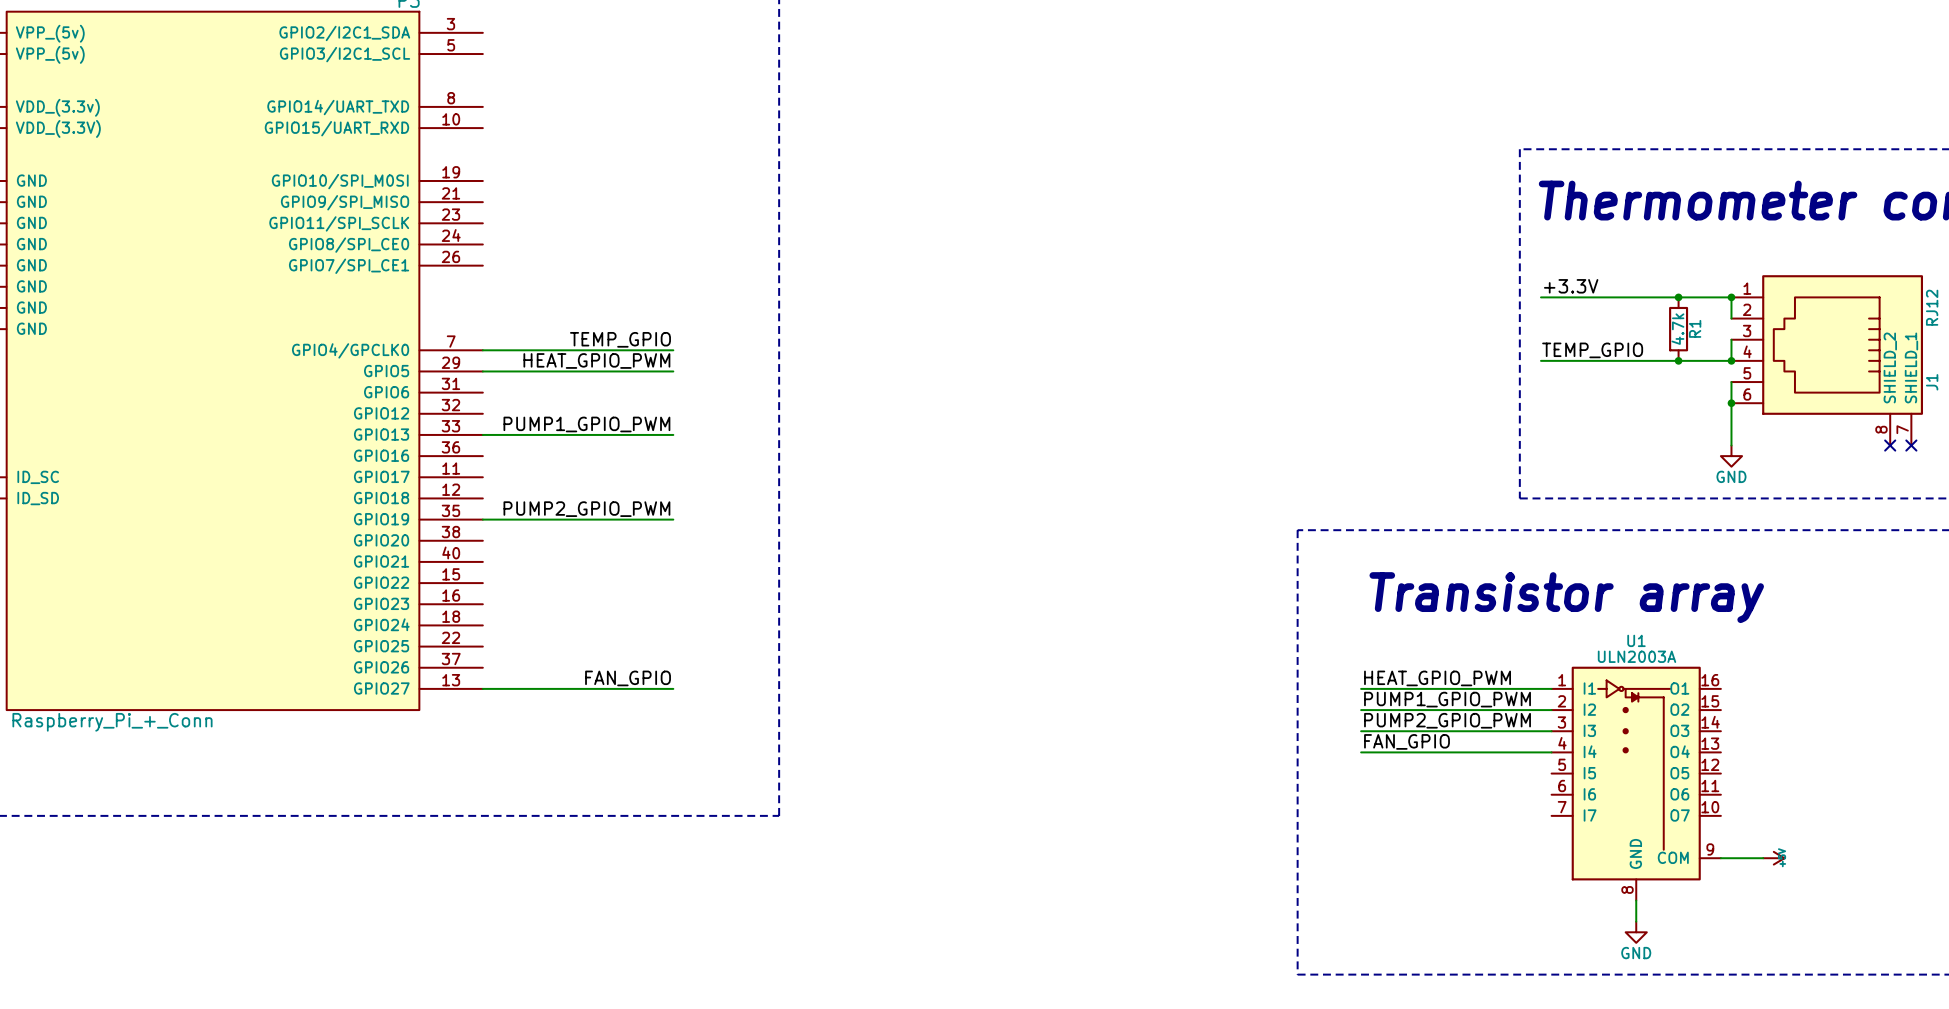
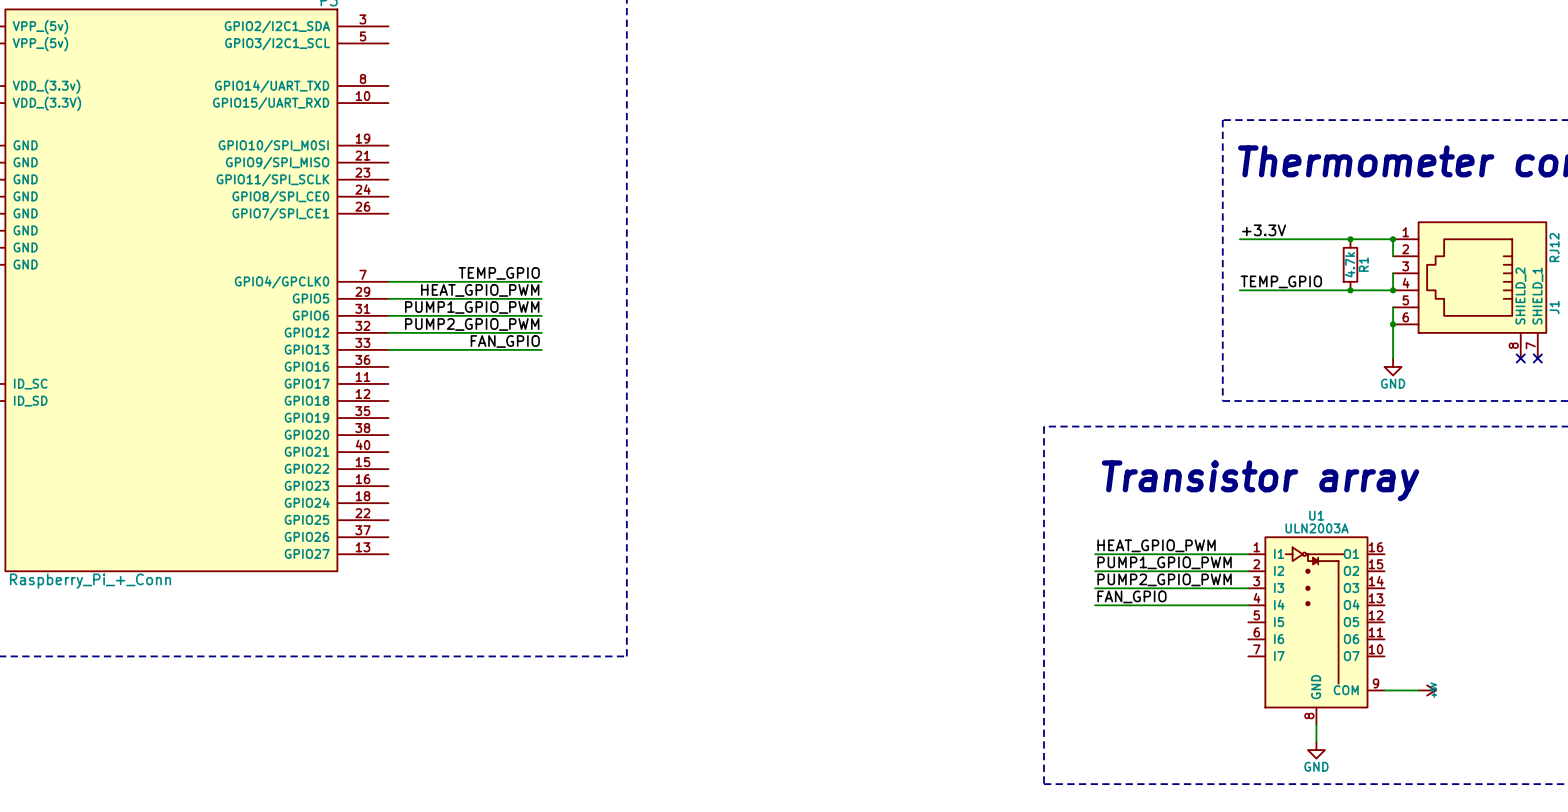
label: none -> PUMP1_GPIO_PWM (472, 307)
wire: none -> (388, 315) (541, 315)
label: PUMP1_GPIO_PWM (586, 424) -> FAN_GPIO (505, 341)
label position: PUMP2_GPIO_PWM (586, 509) -> PUMP2_GPIO_PWM (472, 324)
wire: (482, 519) (673, 519) -> (388, 332) (541, 332)
label: FAN_GPIO (628, 678) -> none
wire: (482, 688) (673, 688) -> none

